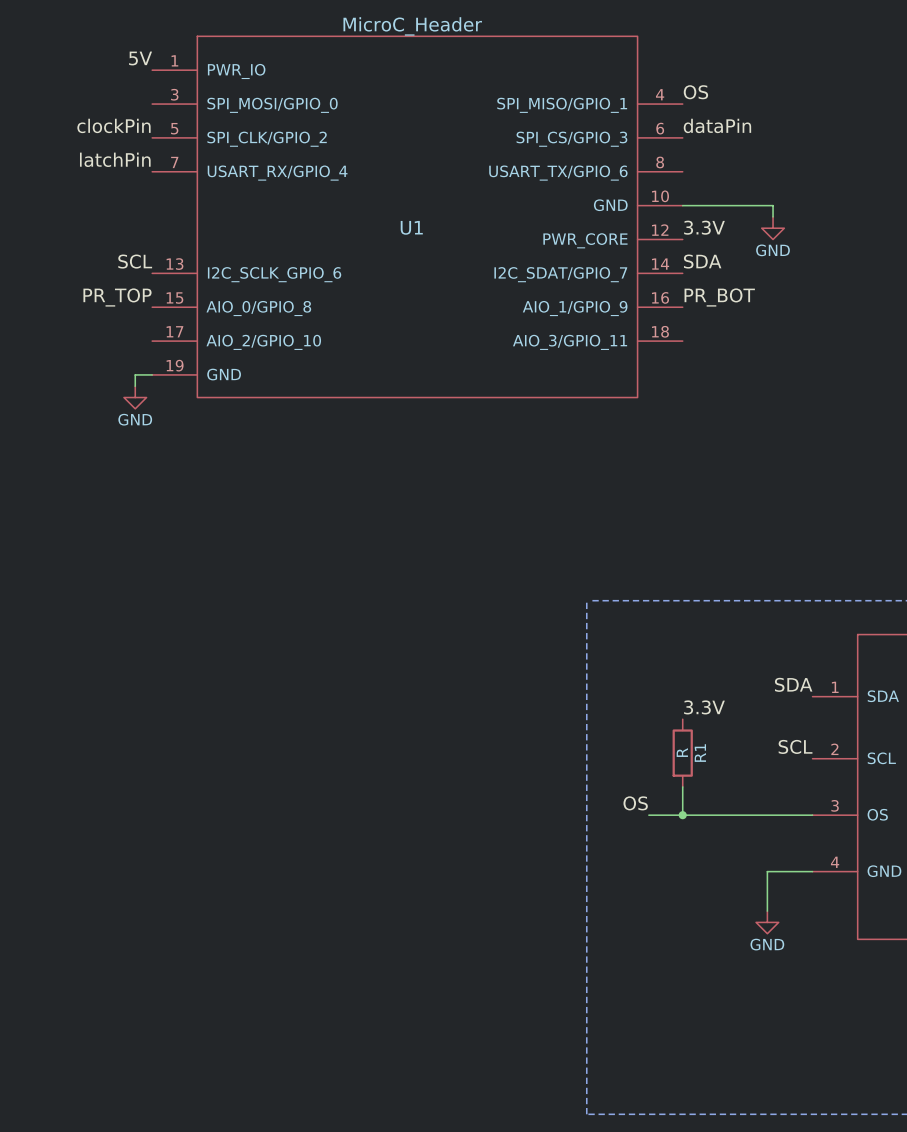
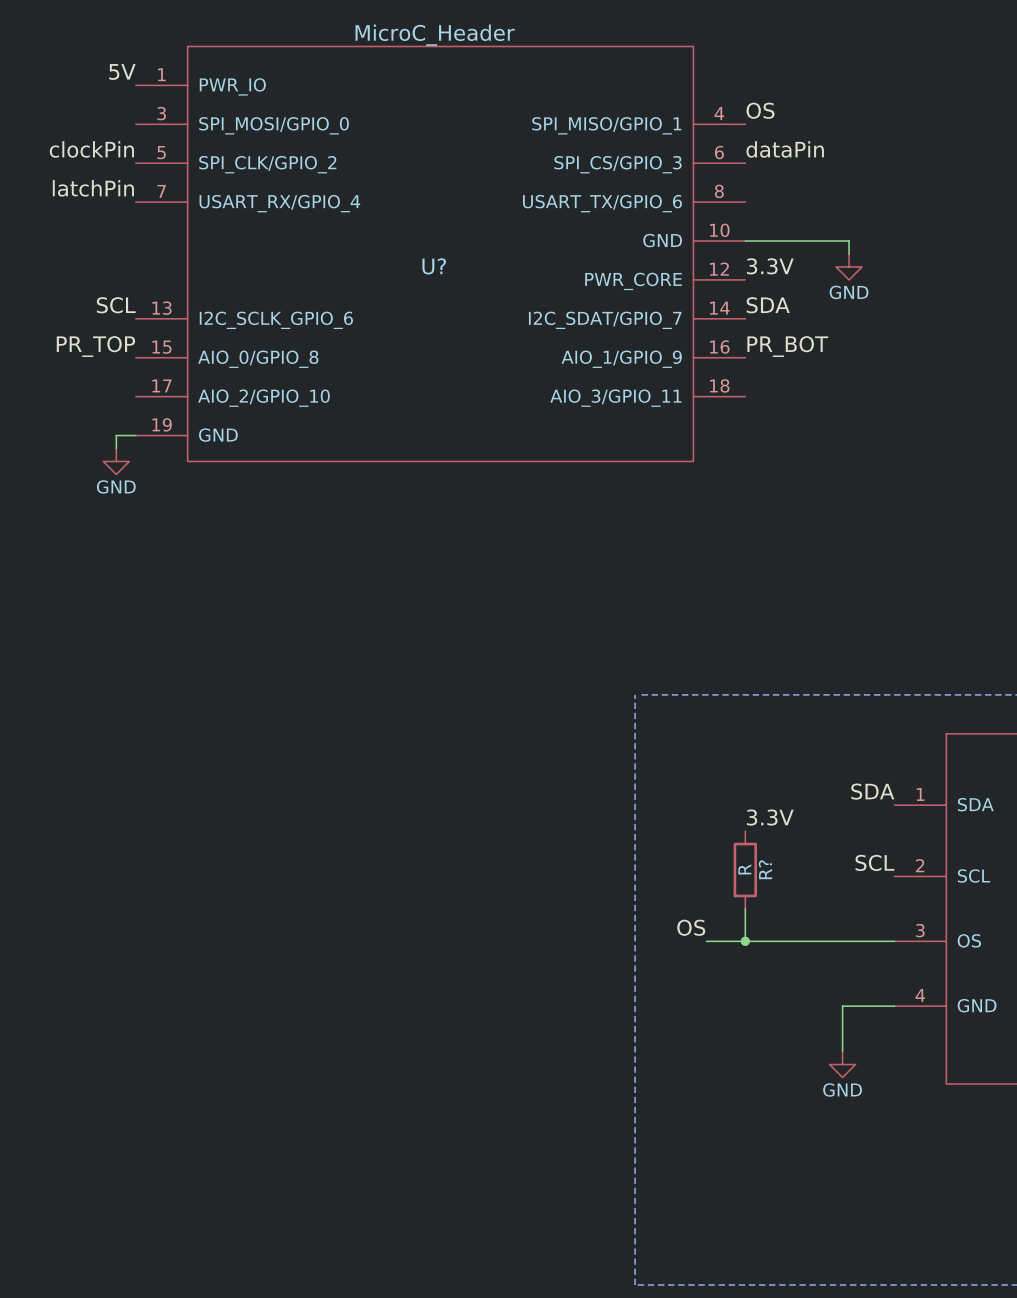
U1 name: U1 (411, 227) -> U? (434, 266)
R1 name: R1 (700, 753) -> R? (765, 869)

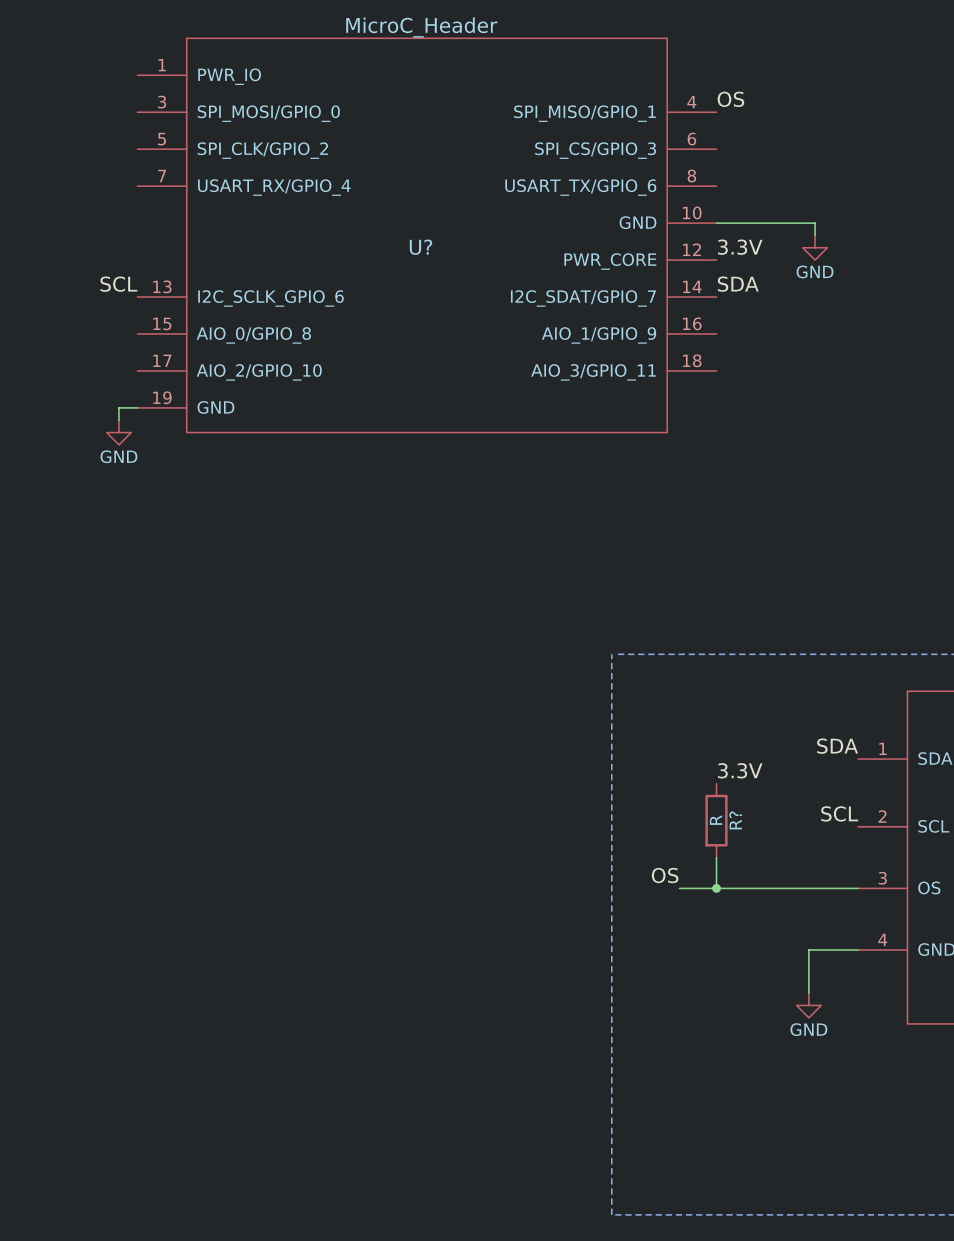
label: 5V (122, 71) -> none
label: clockPin (91, 149) -> none
label: dataPin (785, 149) -> none
label: latchPin (93, 188) -> none
label: PR_TOP (95, 346) -> none
label: PR_BOT (787, 346) -> none

